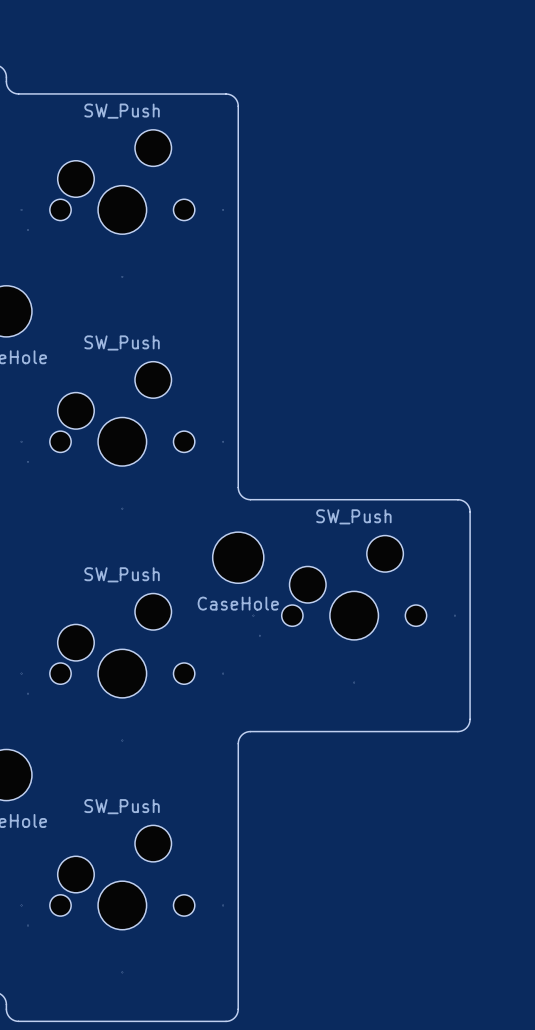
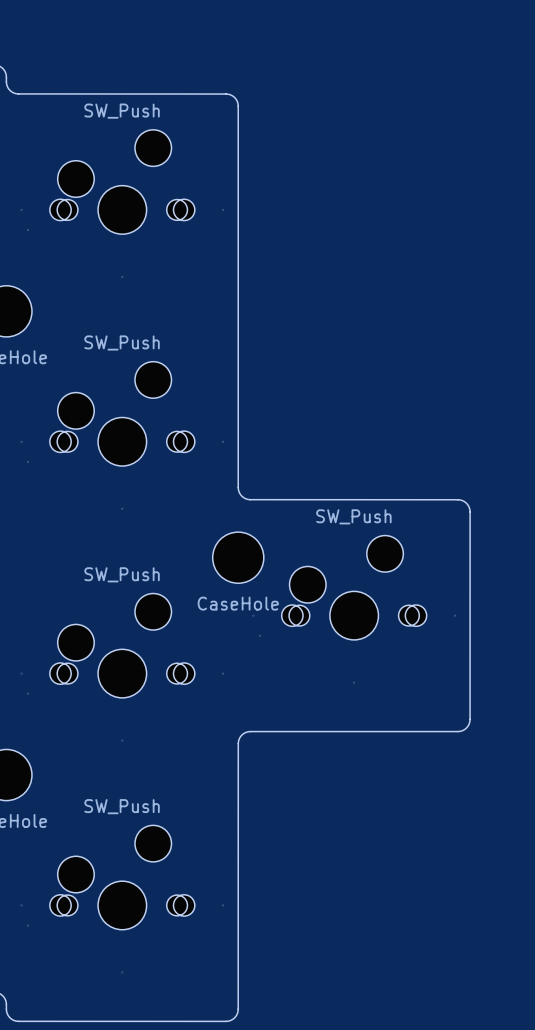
part footprint: [20, 129, 224, 278] -> [20, 129, 224, 278]
part footprint: [20, 361, 224, 510] -> [20, 361, 224, 510]
part footprint: [252, 535, 456, 684] -> [252, 535, 456, 684]
part footprint: [20, 593, 224, 742] -> [20, 593, 224, 742]
part footprint: [20, 825, 224, 974] -> [20, 825, 224, 974]

